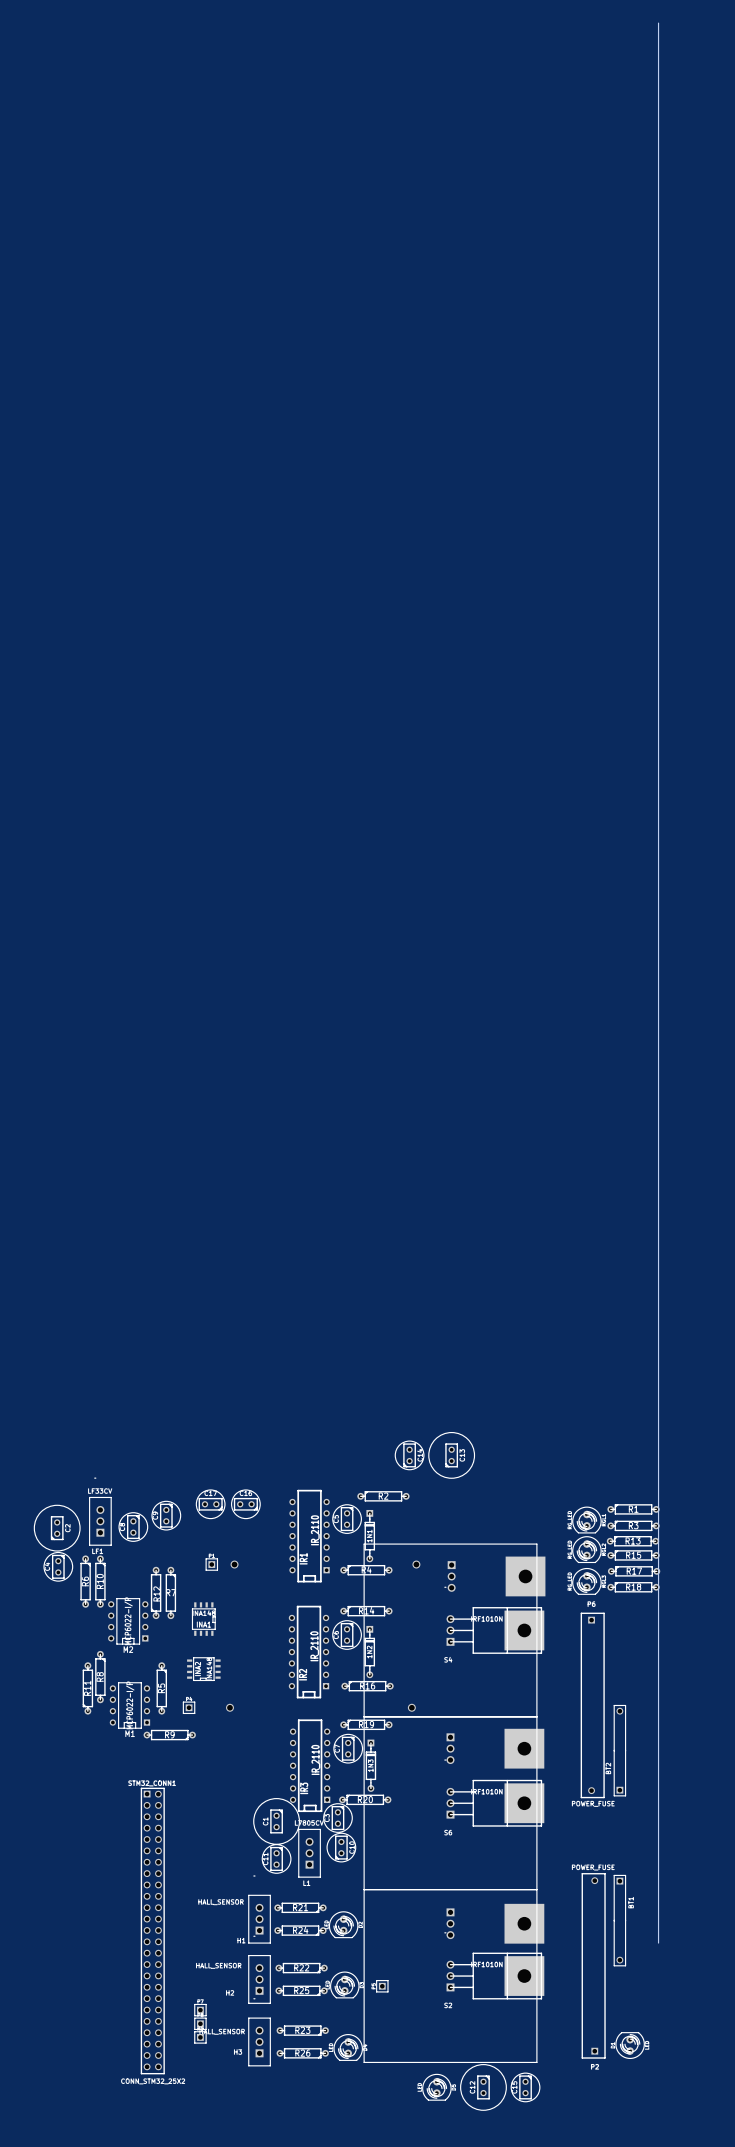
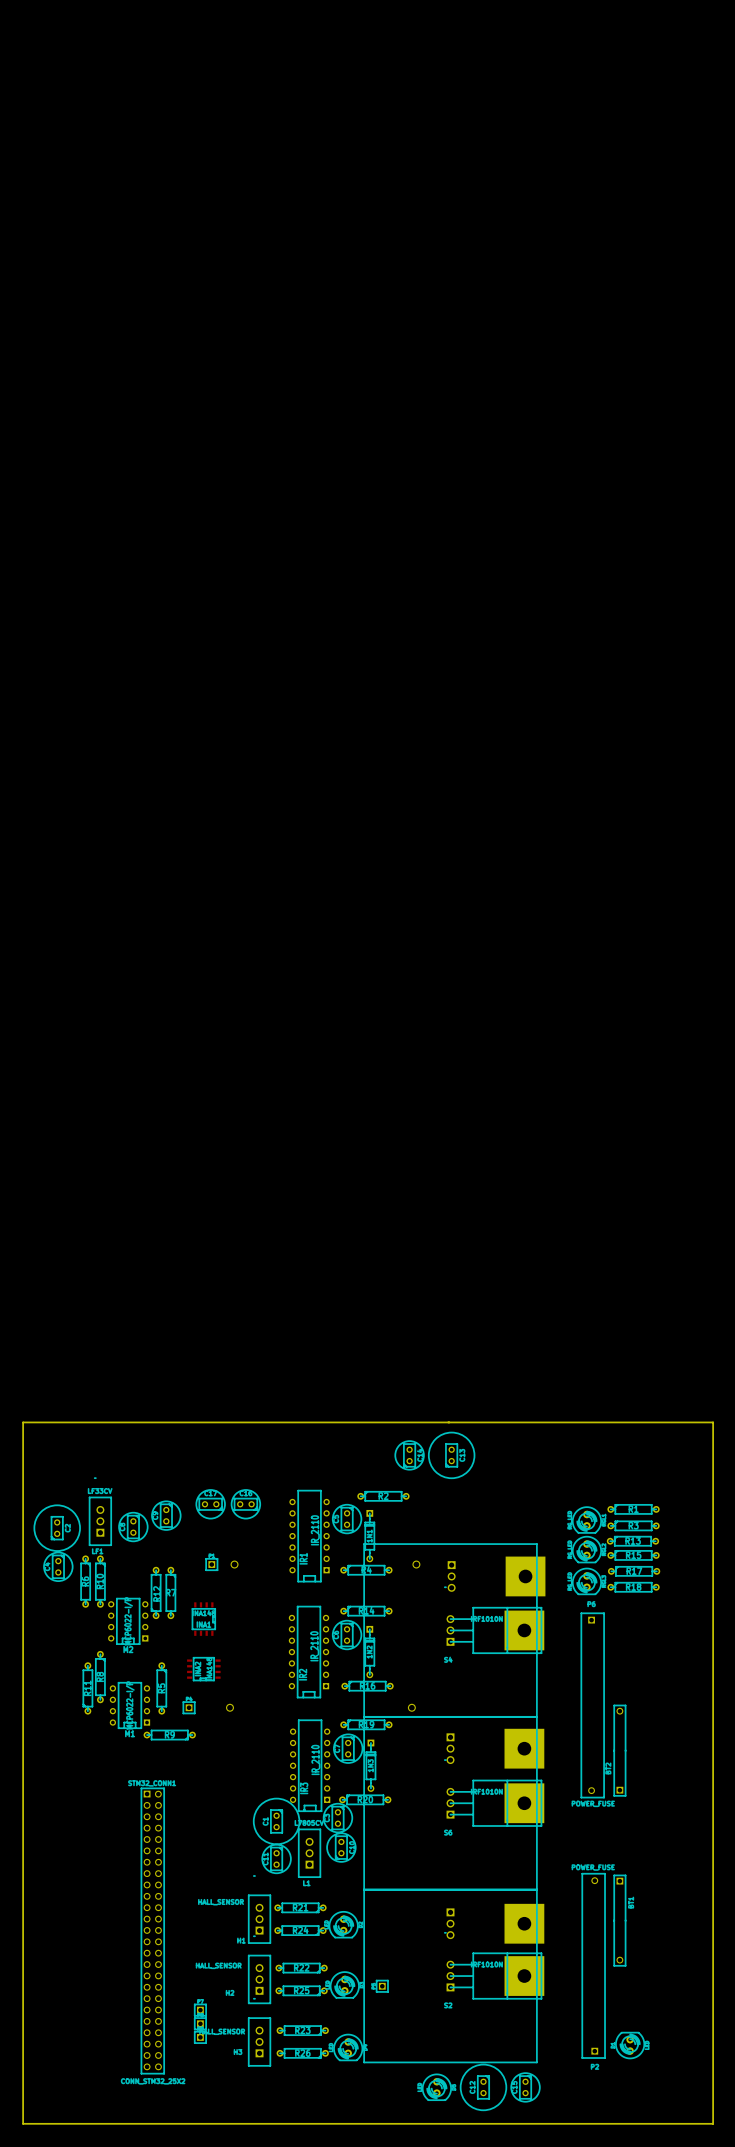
board edge: (658, 23) (658, 1943) -> none
board edge: none -> (23, 1422) (713, 1422) (713, 2123) (23, 2123) (23, 1422)

